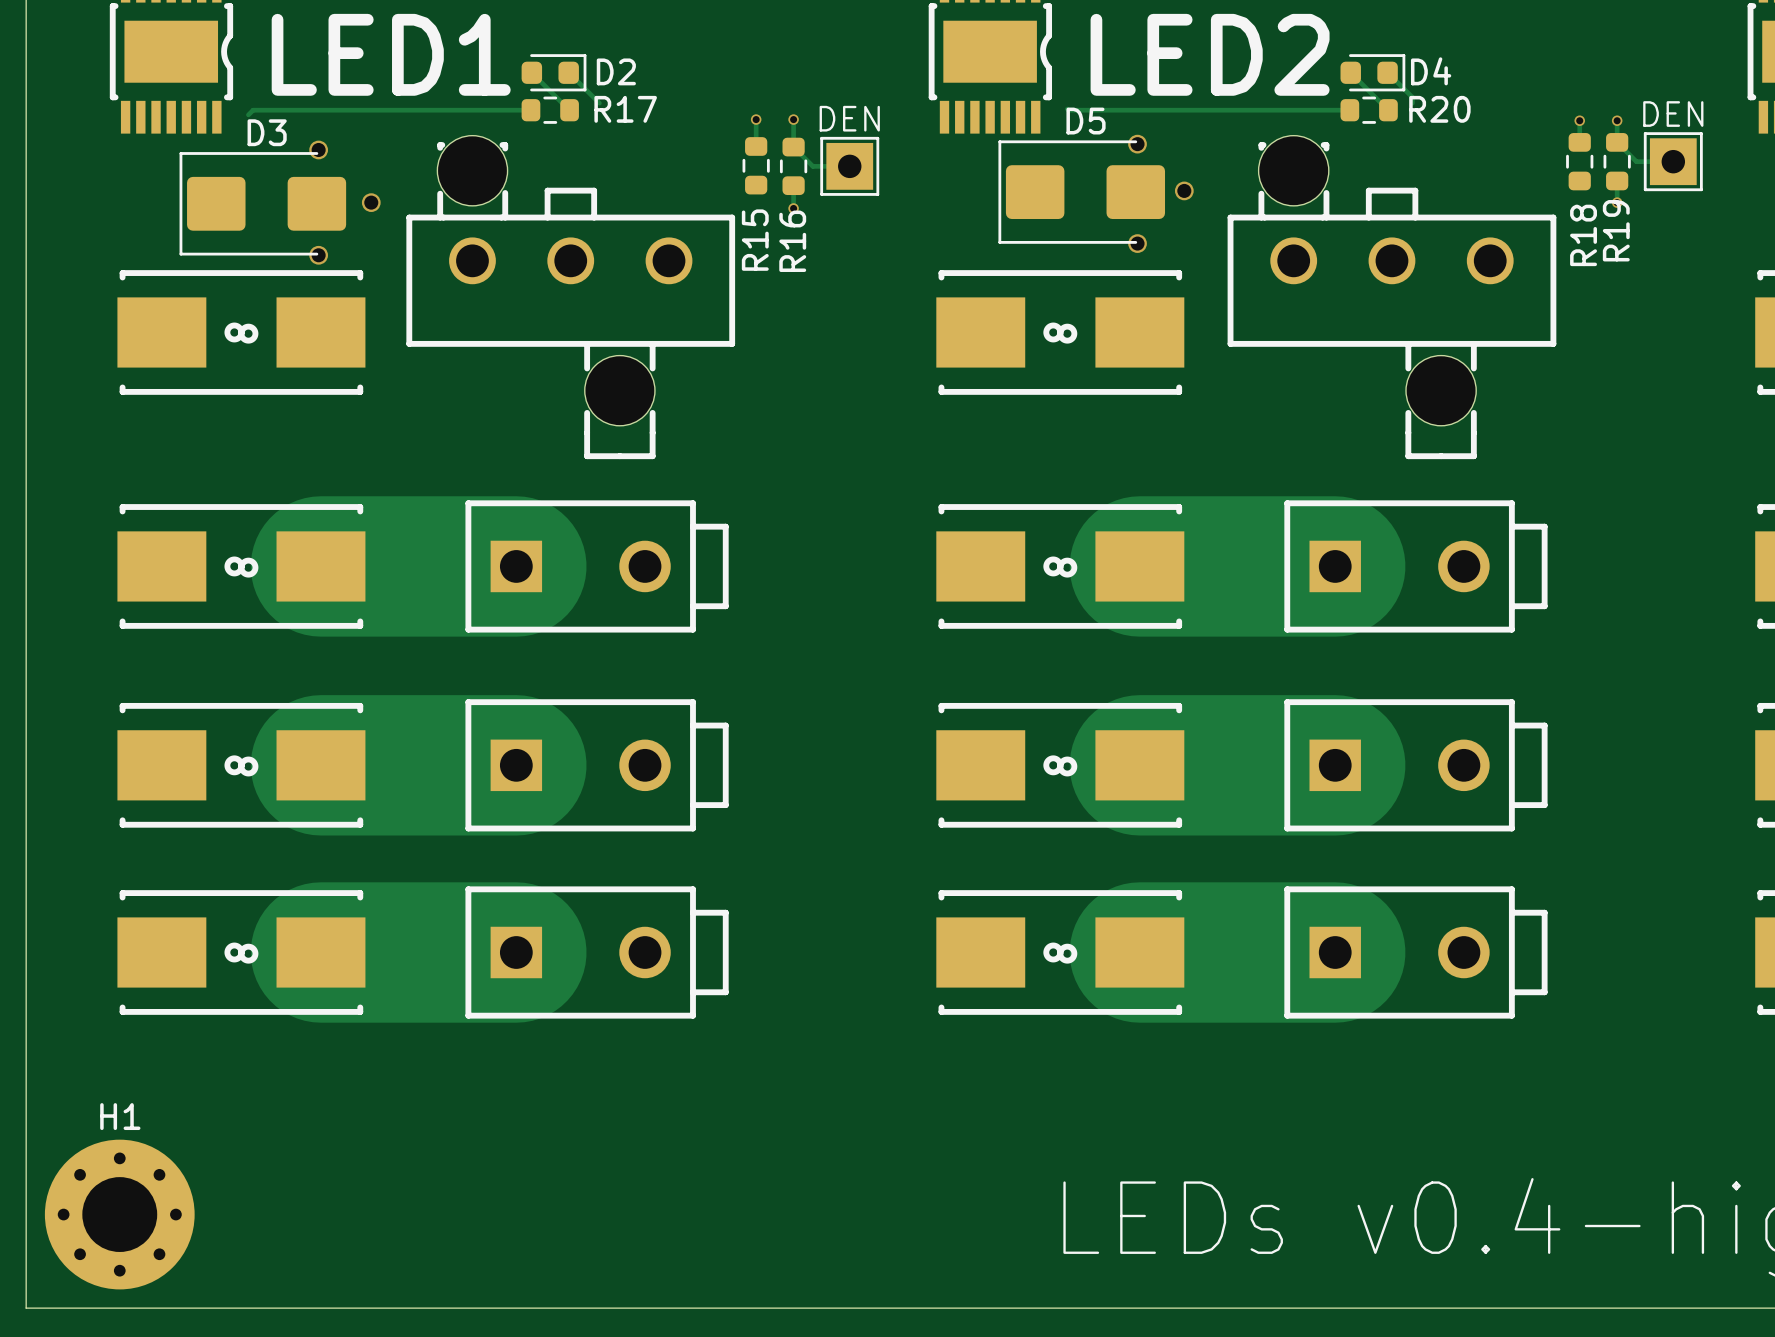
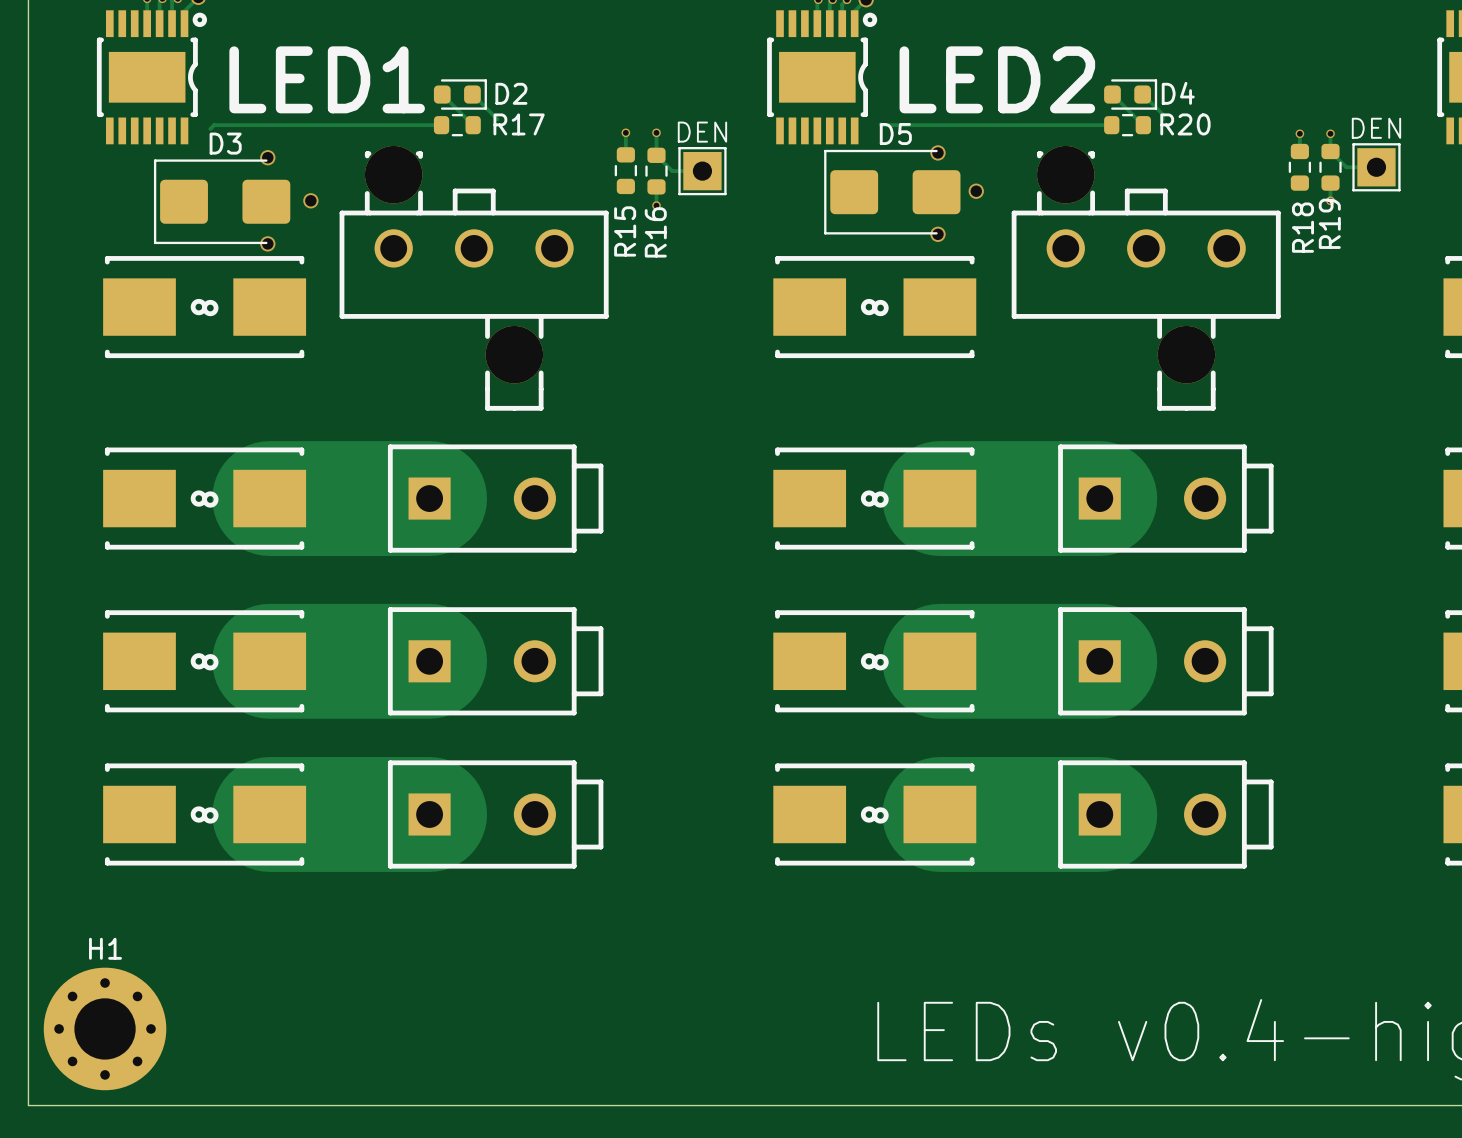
part footprint: [406, 135, 736, 460] -> [339, 145, 609, 411]
part footprint: [1227, 135, 1557, 460] -> [1011, 145, 1281, 411]

